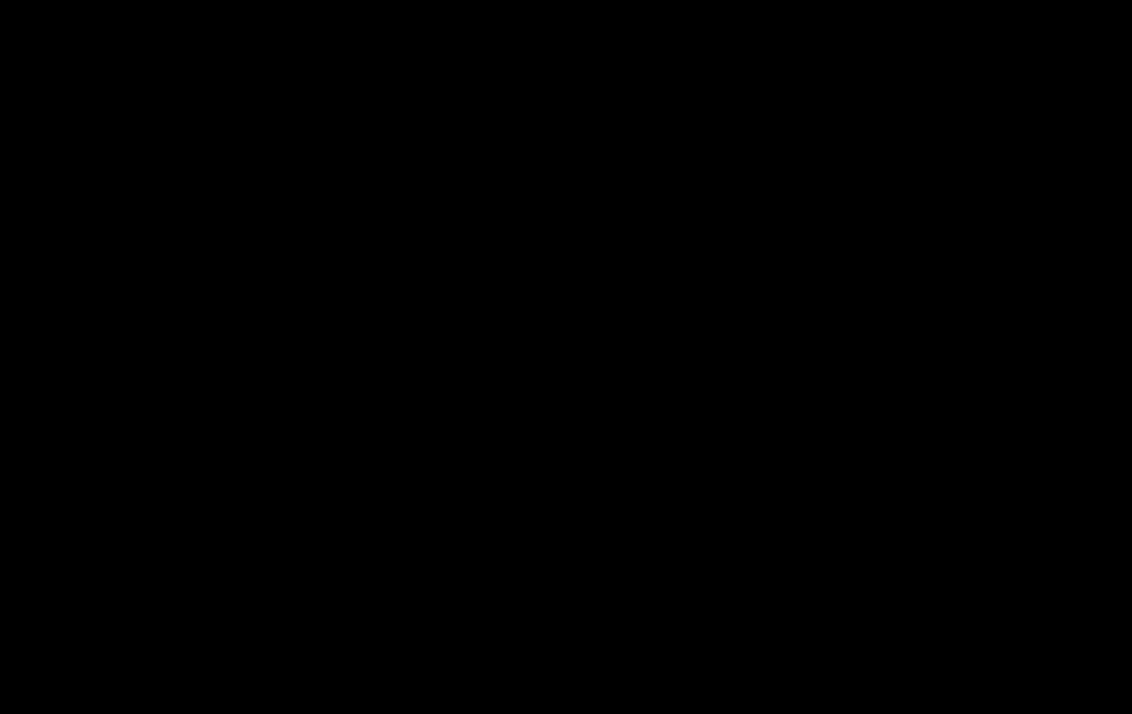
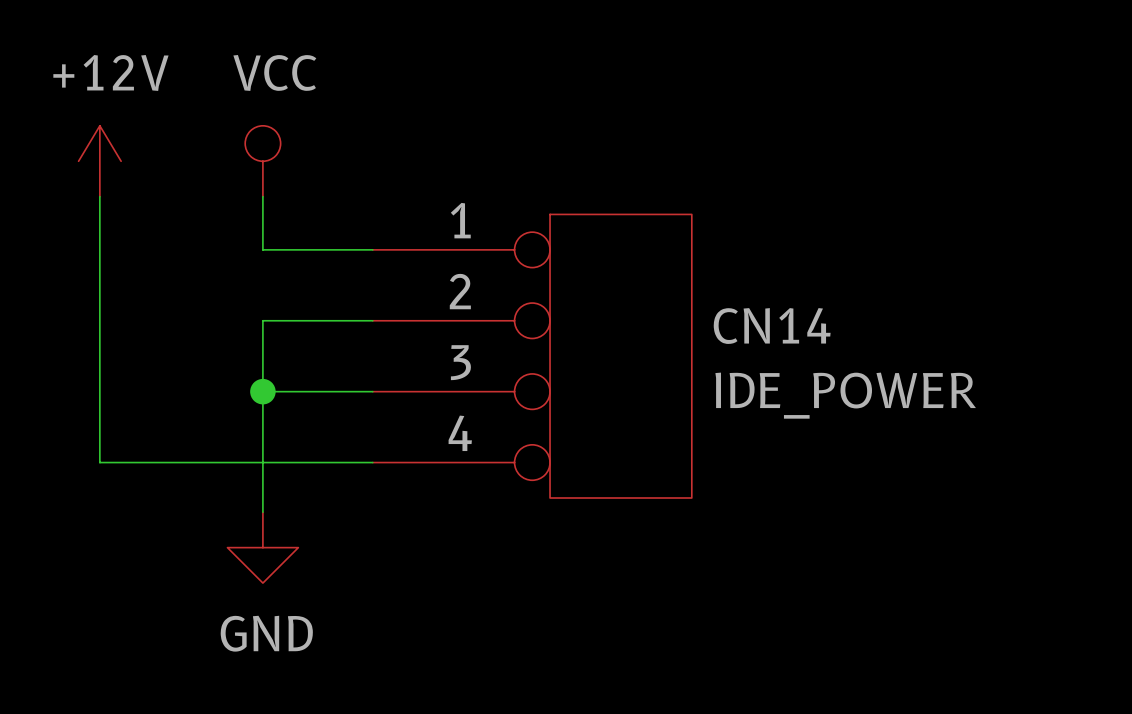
power symbol: none -> +12V (99, 161)
power symbol: none -> VCC (262, 161)
wire: none -> (99, 196) (99, 462) (372, 462)
wire: none -> (262, 196) (262, 249) (372, 249)
wire: none -> (372, 320) (262, 320) (262, 512)
CN14: none -> IDE_POWER (532, 356)
wire: none -> (262, 391) (372, 391)
junction: none -> (262, 391)
power symbol: none -> GND (262, 547)

